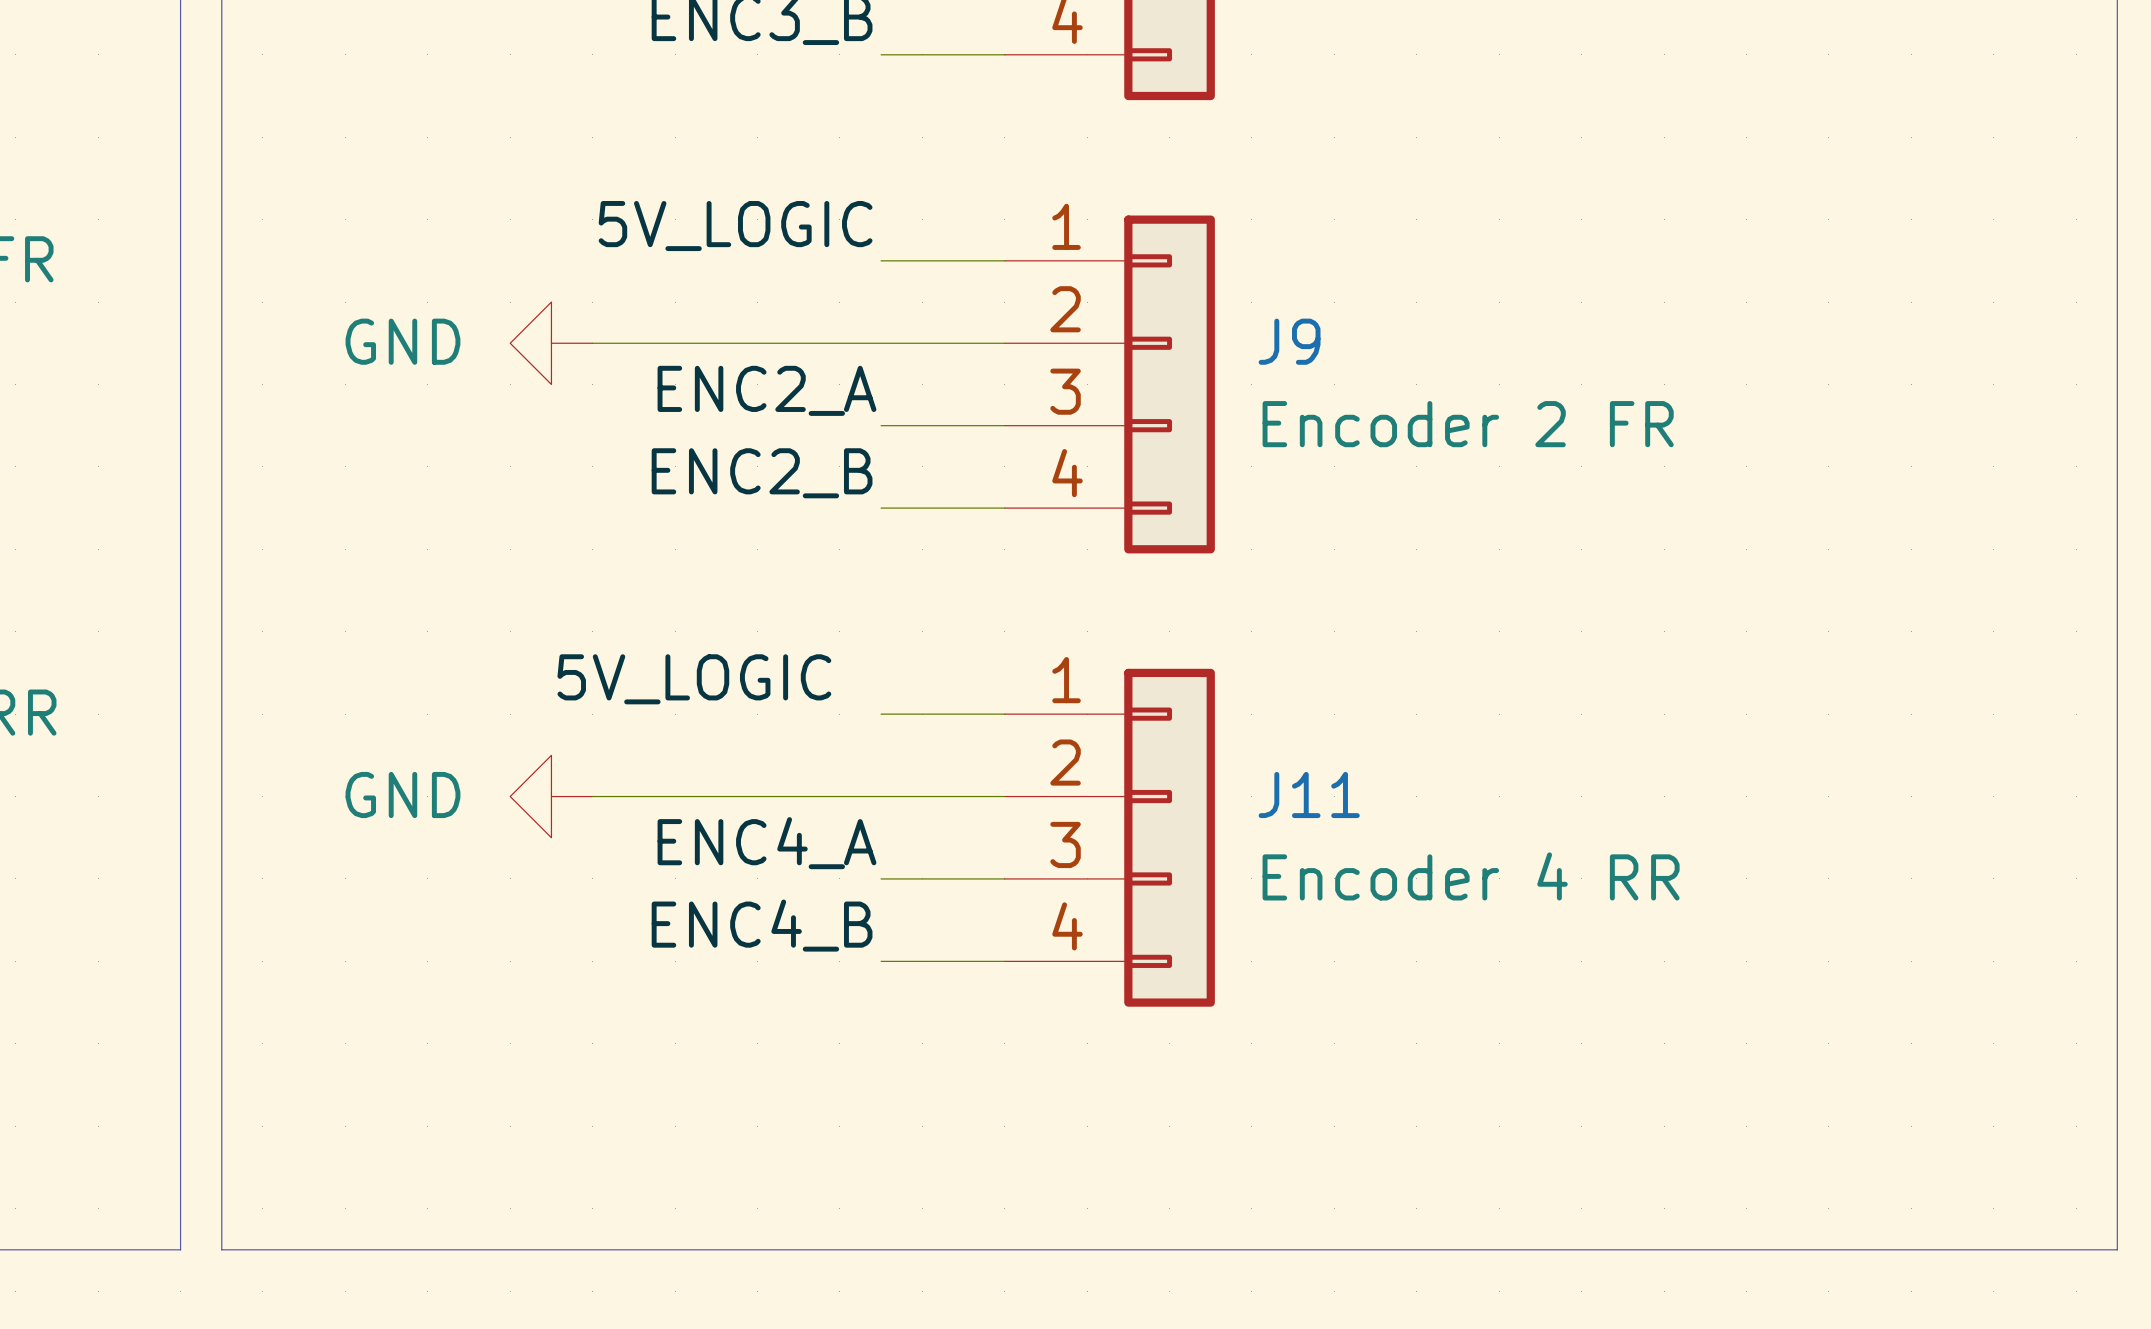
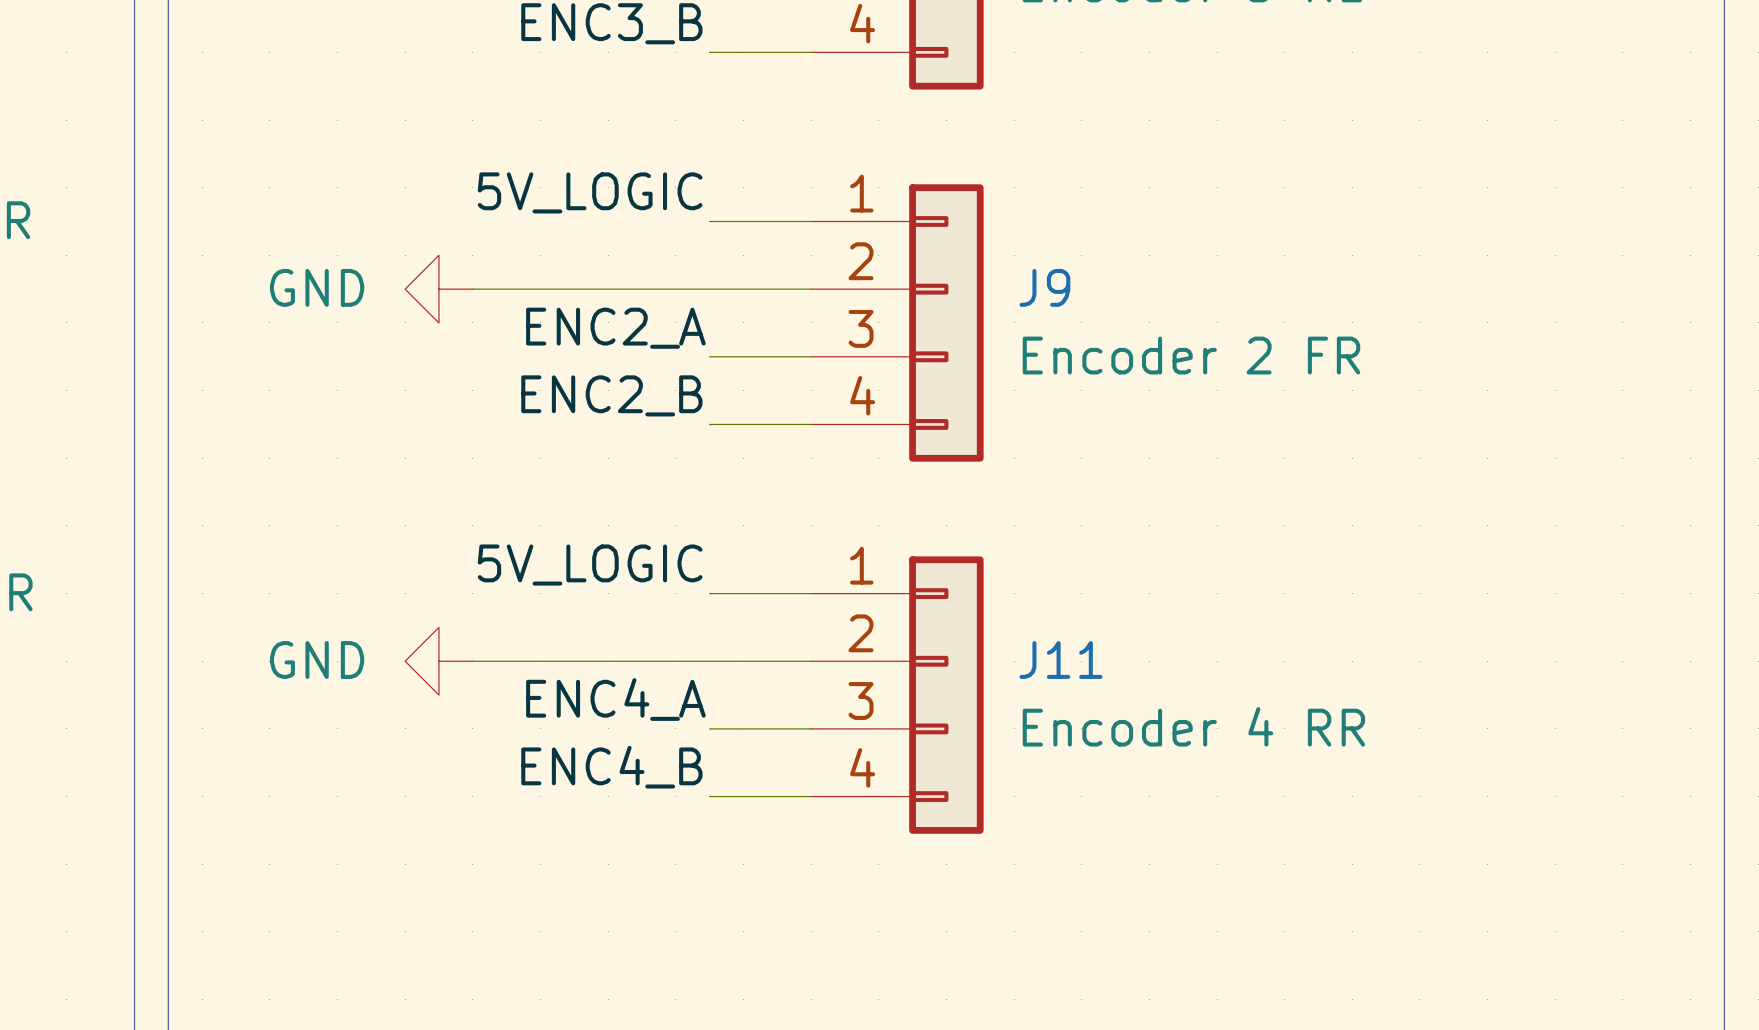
label position: 5V_LOGIC (694, 679) -> 5V_LOGIC (590, 565)

